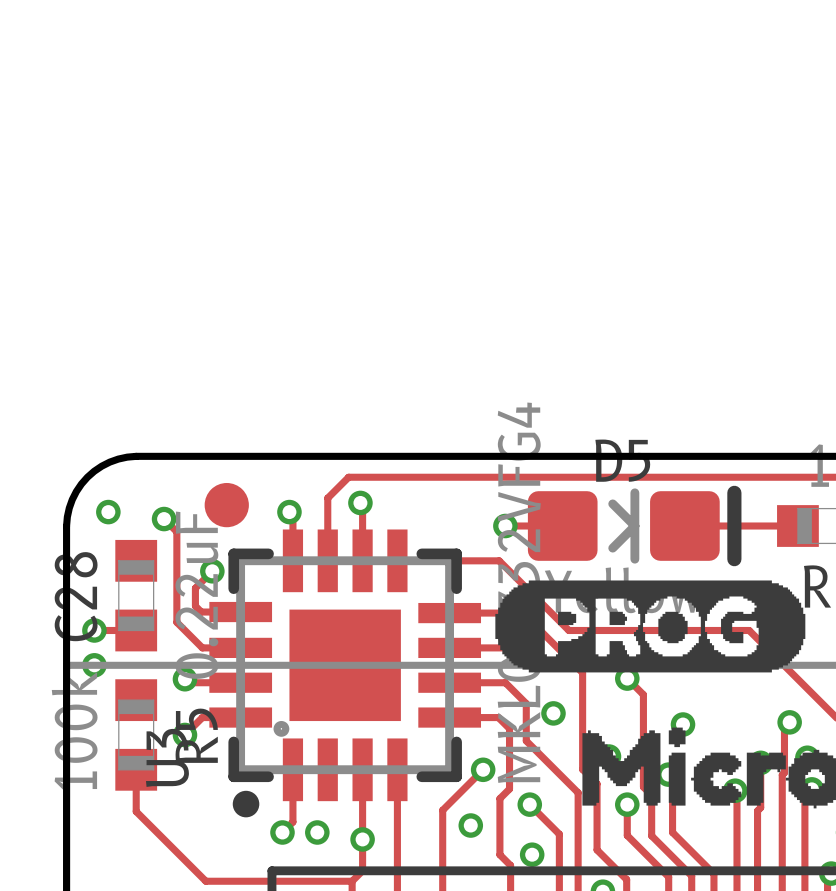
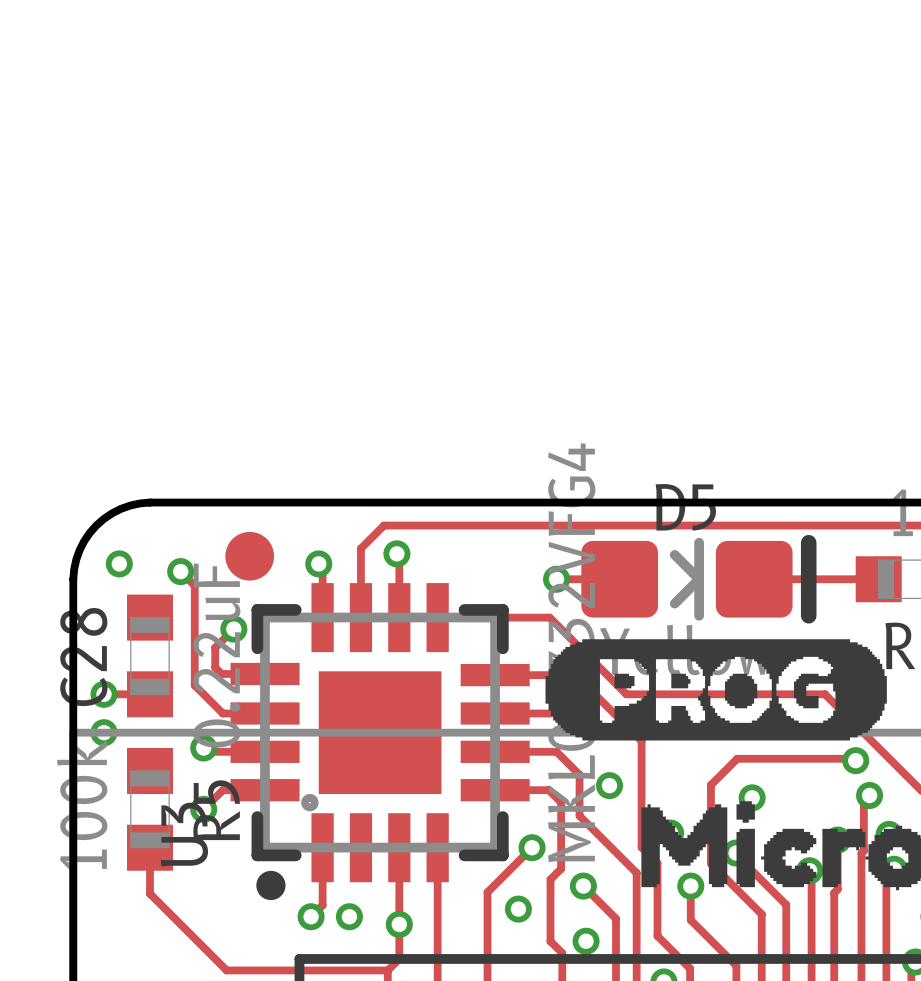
track: (627, 678) (643, 694) (643, 787) (651, 795) (651, 835) (691, 875) -> (855, 760) (853, 758) (737, 758) (710, 785) (710, 863) (761, 914) (761, 964)
via position: (627, 678) -> (855, 760)
track: (672, 780) (672, 832) (713, 873) -> (740, 859) (786, 904) (786, 962)

